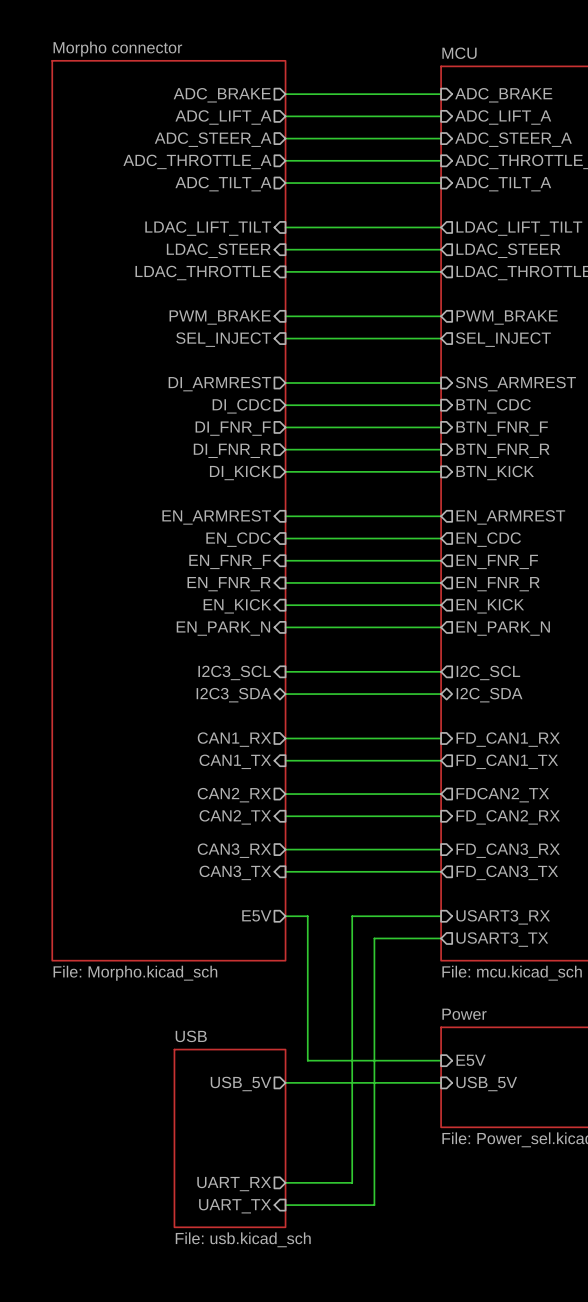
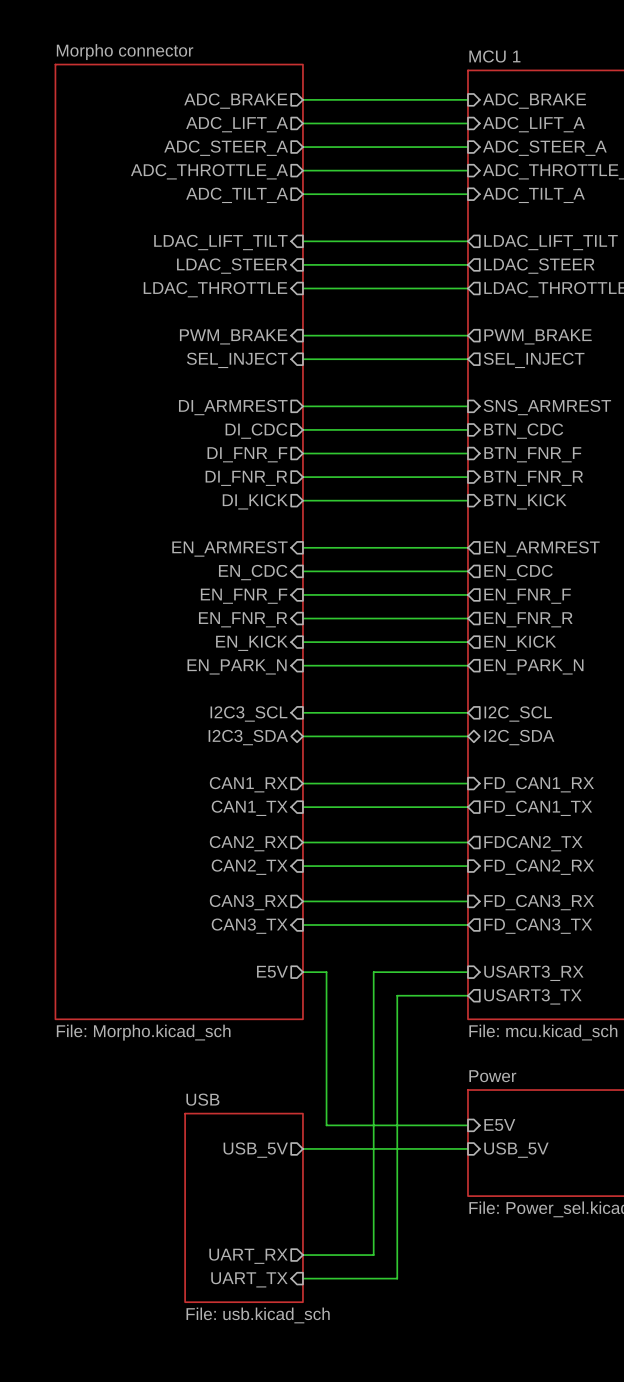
sheet MCU name: MCU (459, 53) -> MCU 1 (494, 56)

